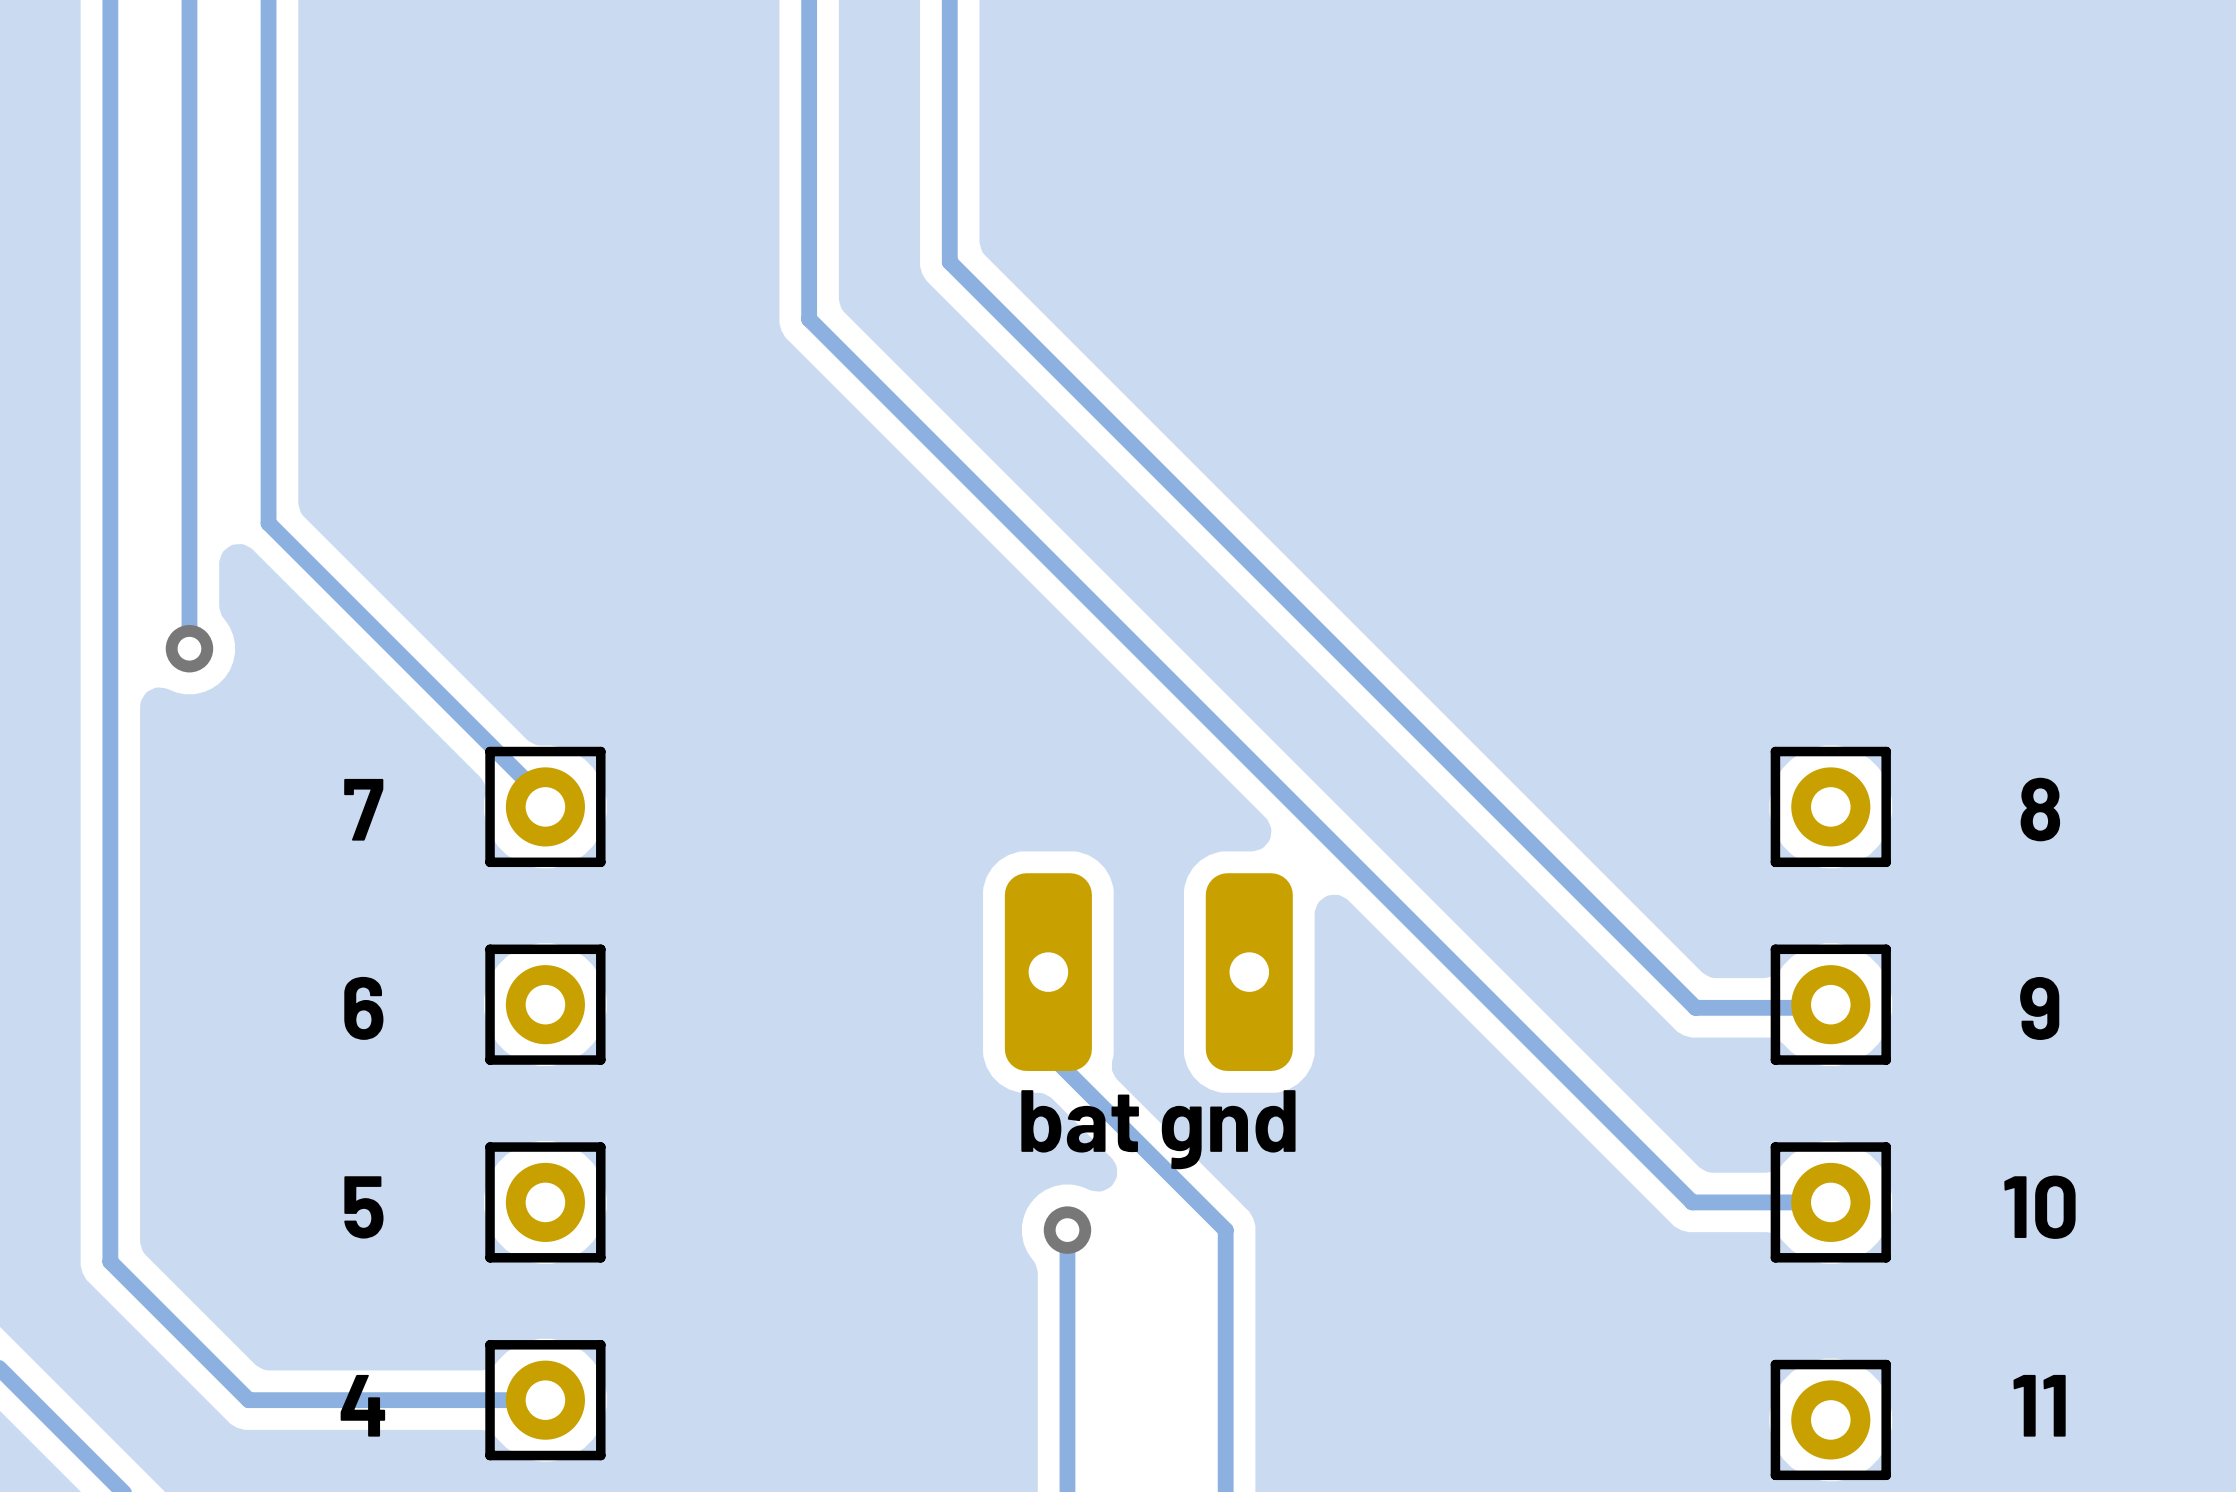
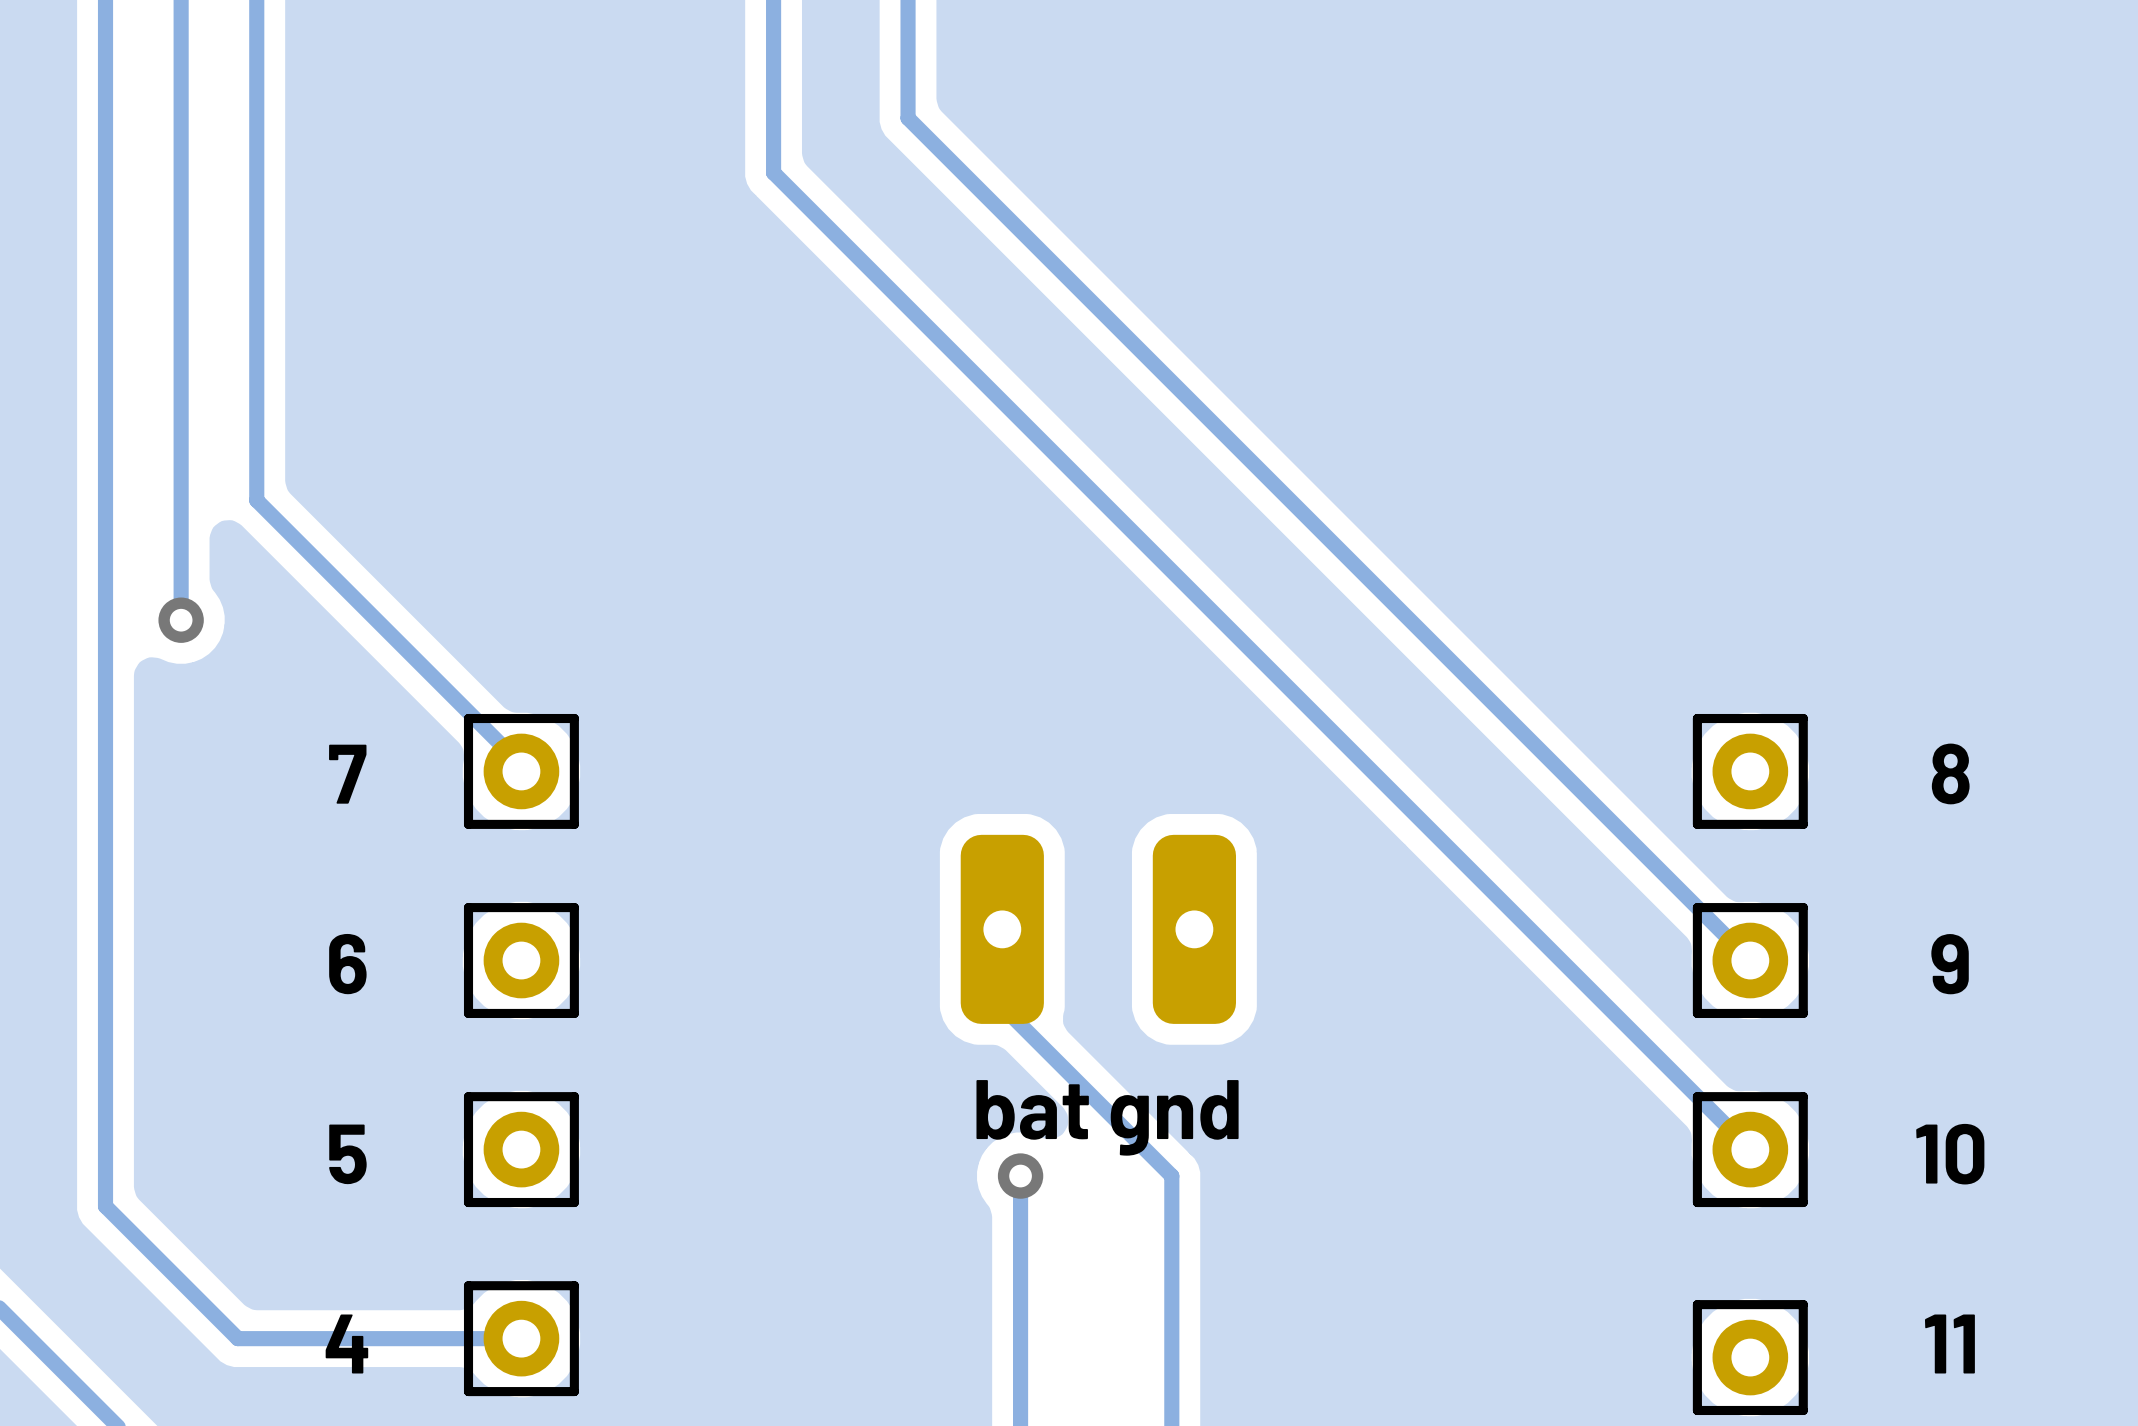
track: (949, 123) (949, 262) (1695, 1007) (1830, 1007) -> (908, 118) (1750, 960) (1750, 963)
track: (809, 180) (809, 319) (1692, 1202) (1824, 1202) -> (773, 172) (1744, 1143) (1744, 1149)
text position: bat gnd (1158, 1129) -> bat gnd (1107, 1117)

